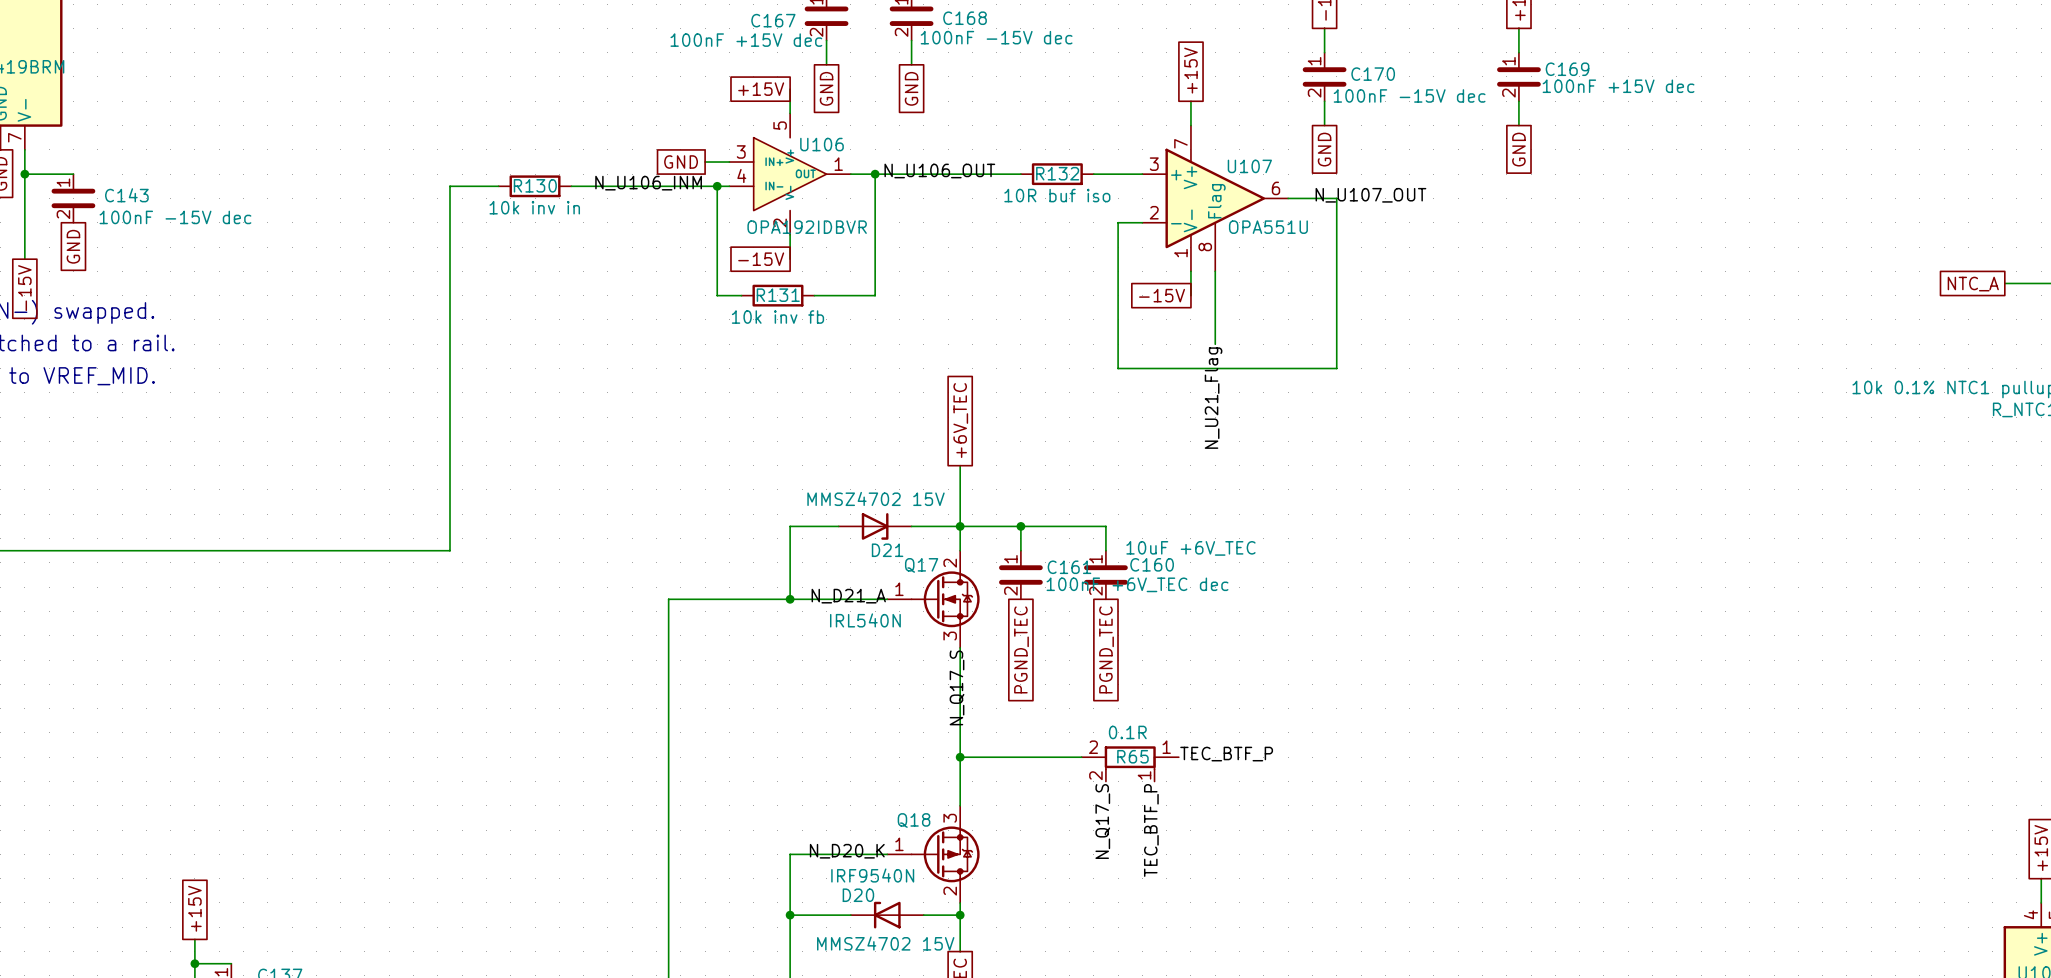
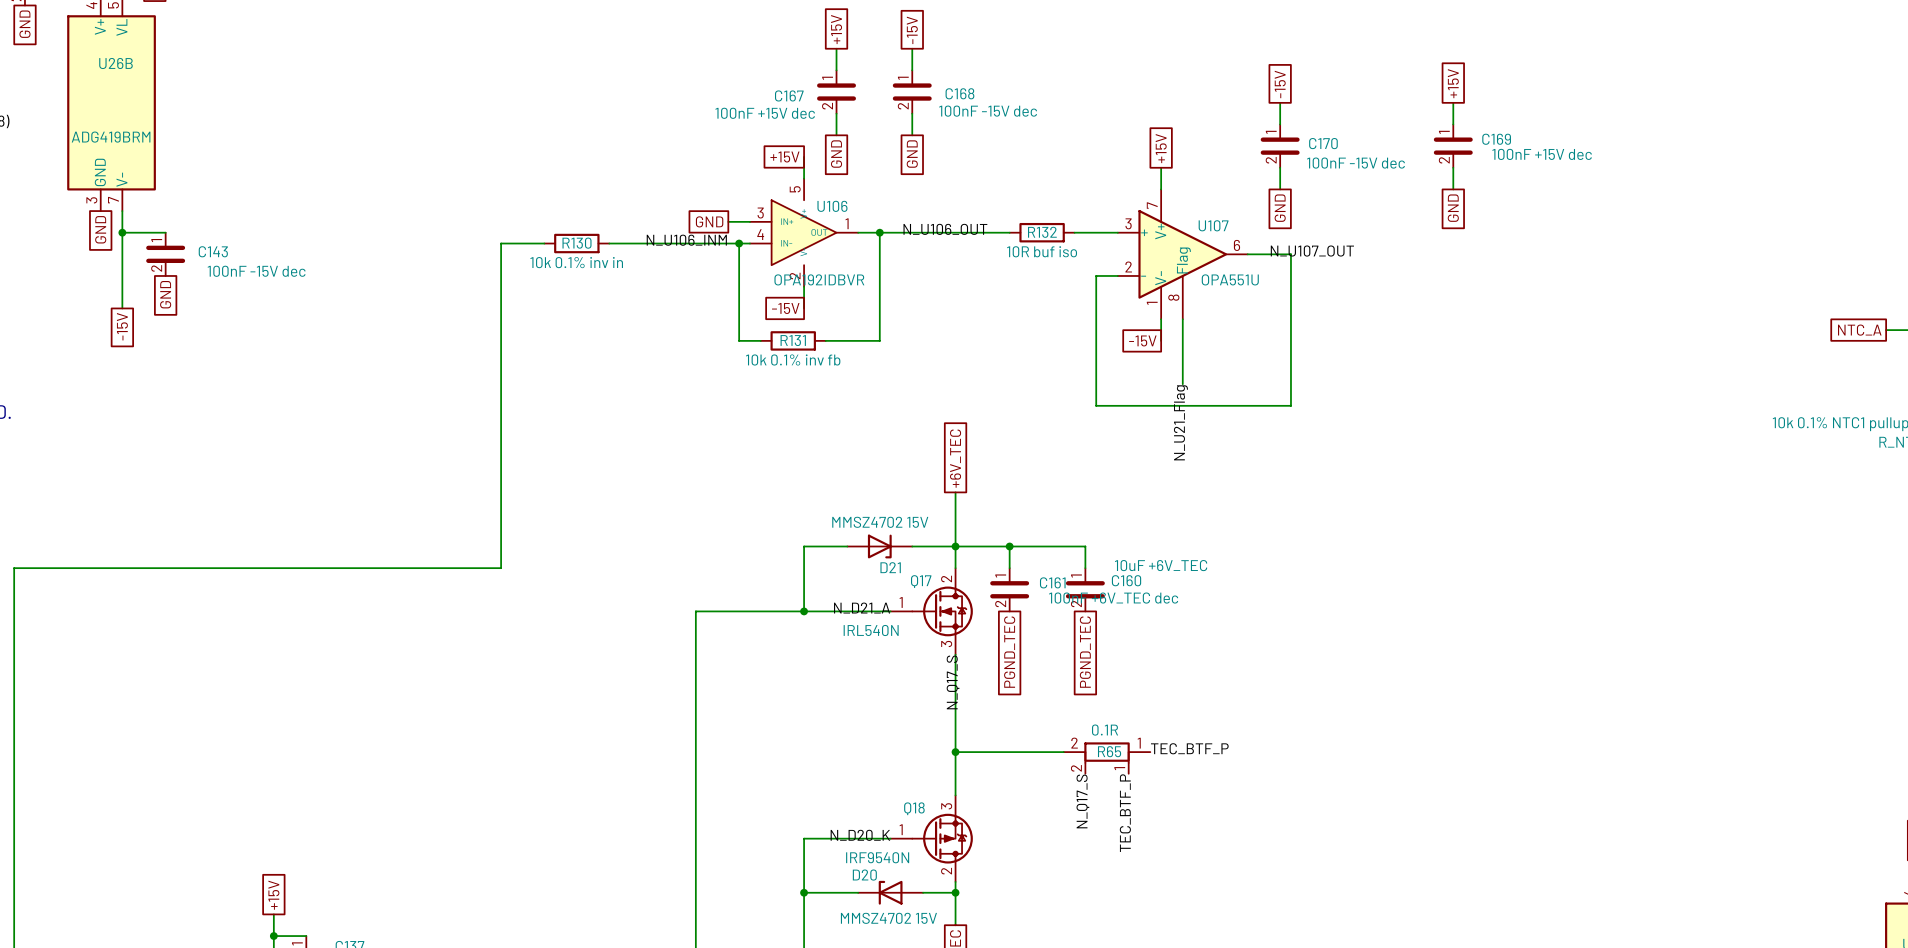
R130 value: 10k inv in (534, 207) -> 10k 0.1% inv in (576, 262)
R131 value: 10k inv fb (777, 317) -> 10k 0.1% inv fb (793, 359)

